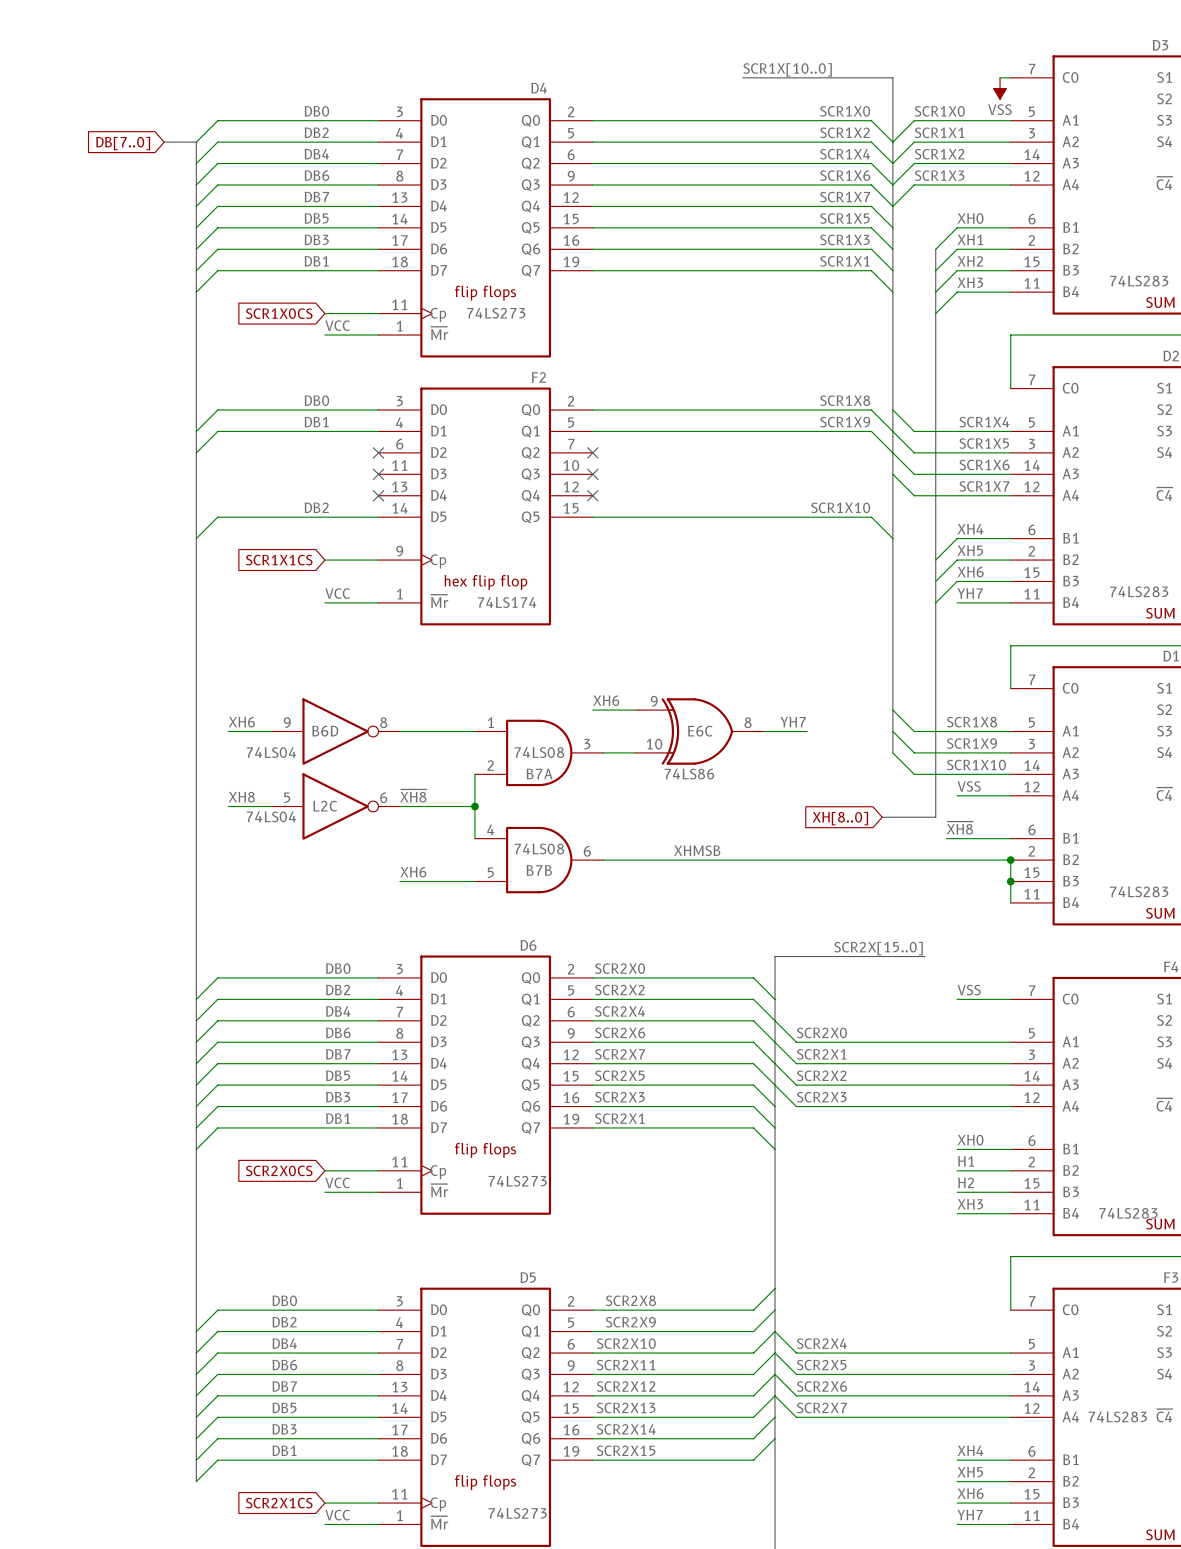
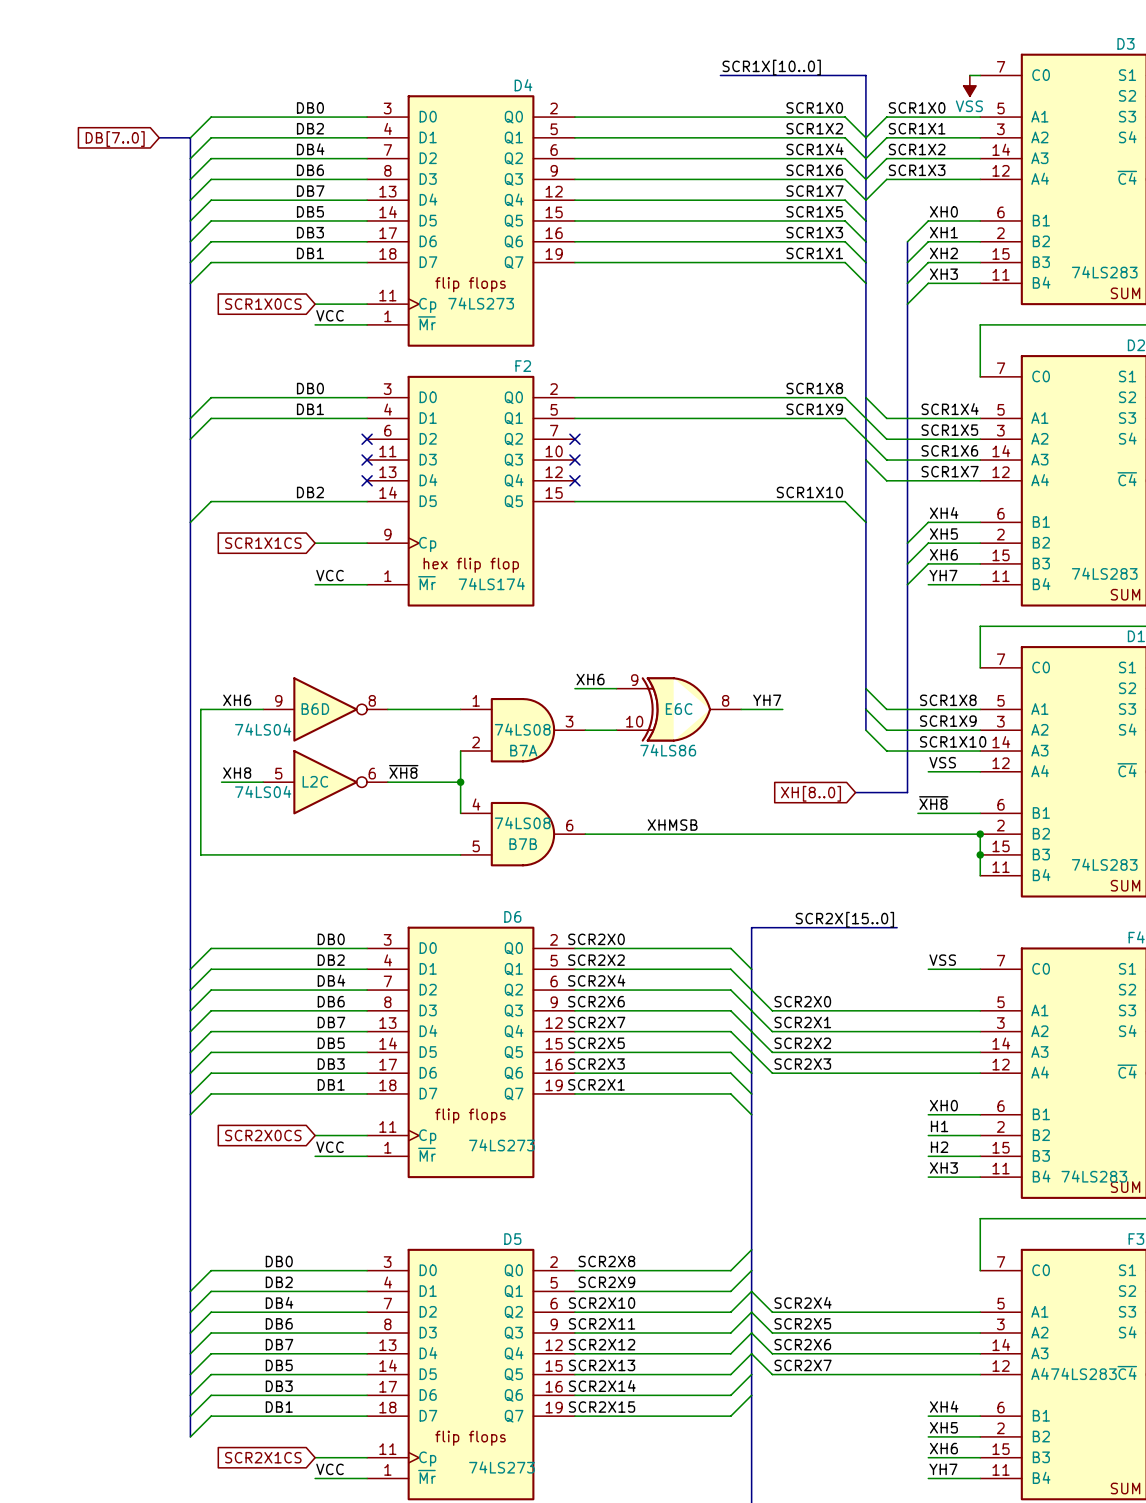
wire: none -> (221, 709) (200, 709) (200, 854) (387, 854)
label: XH6 (413, 872) -> none

